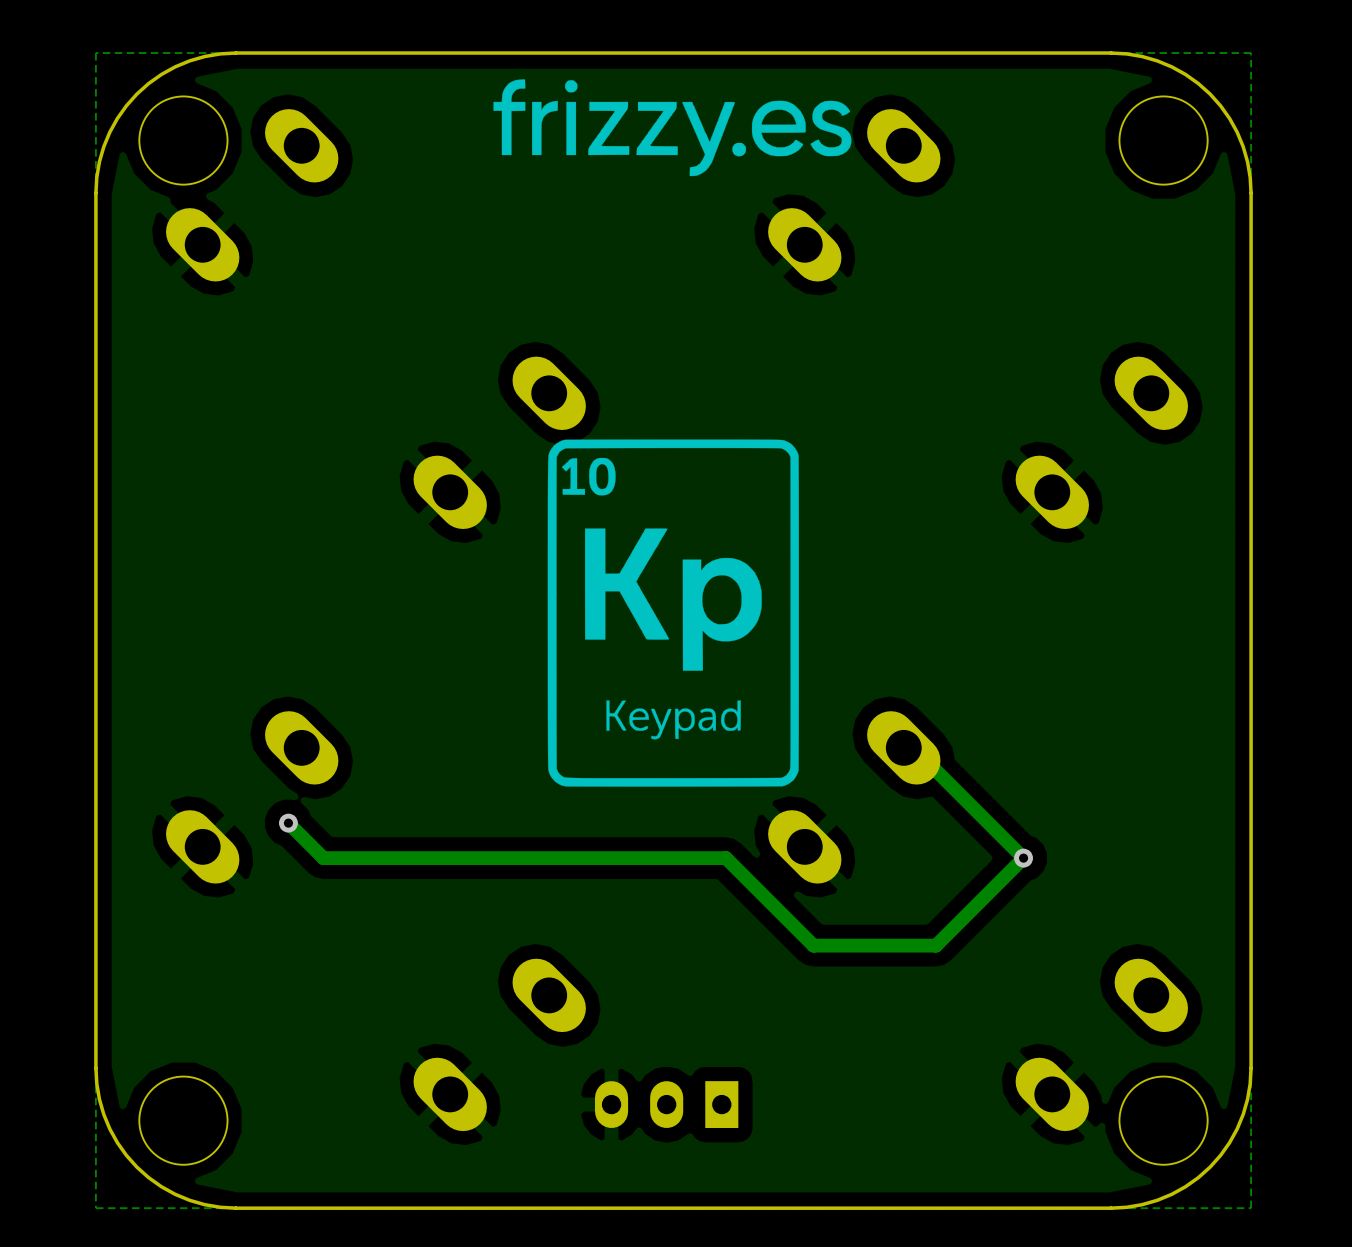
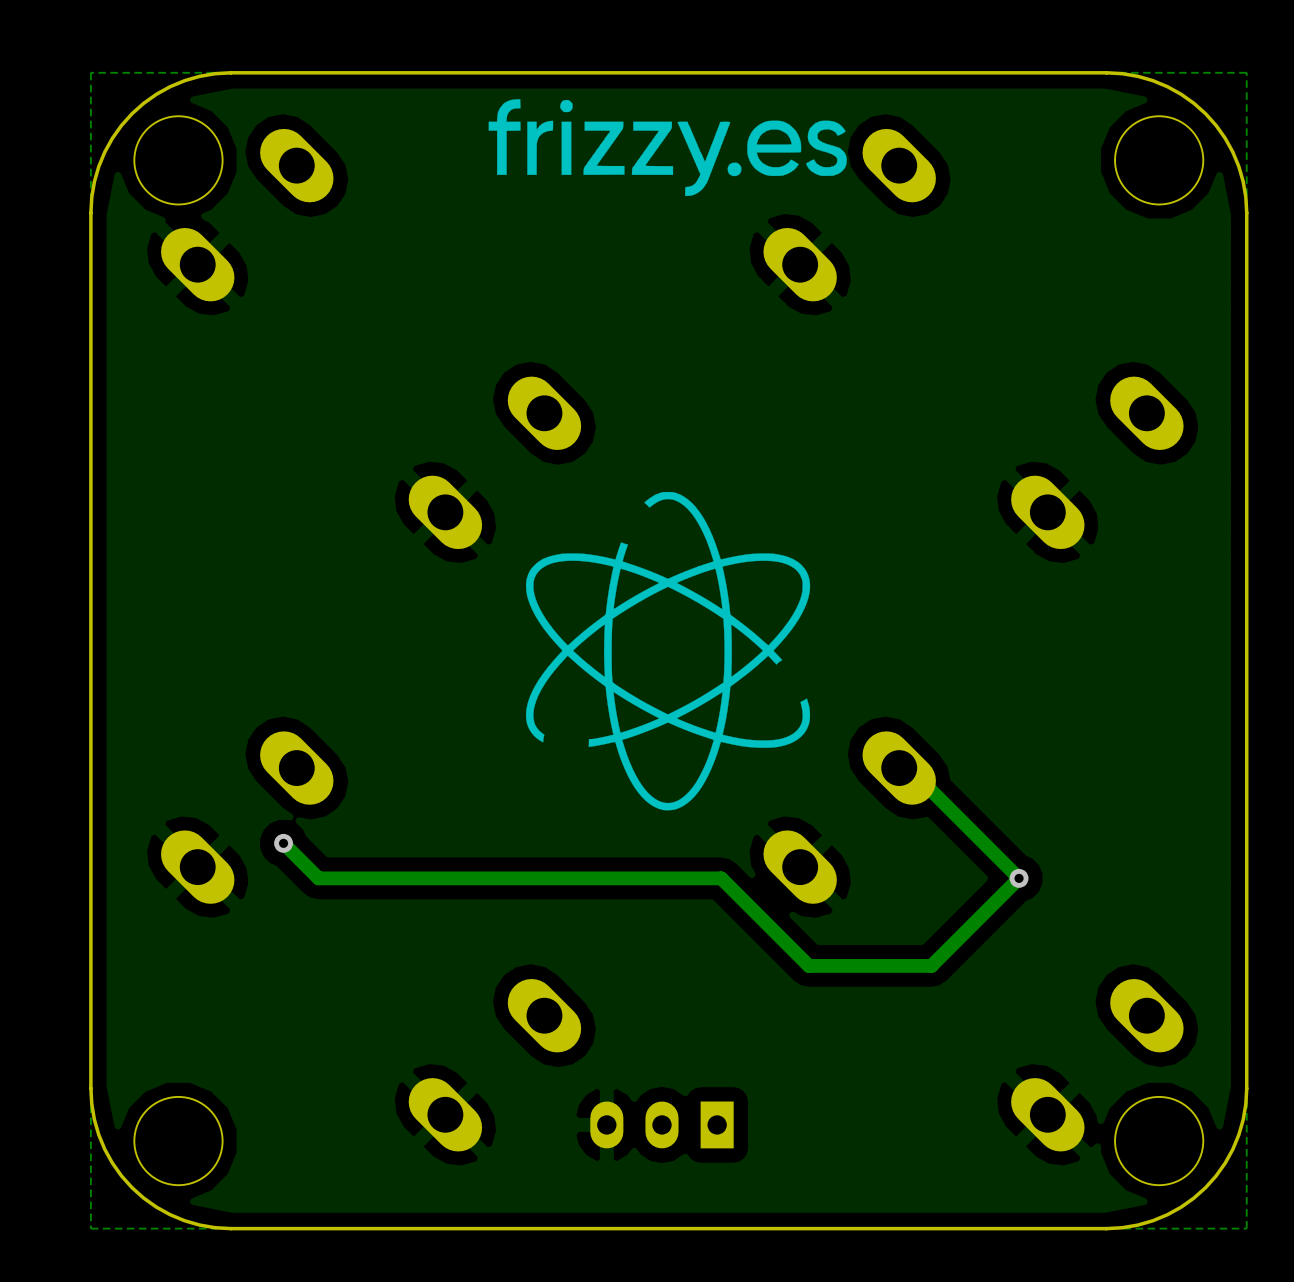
drawing shape: [547, 439, 799, 787] -> [525, 491, 811, 811]

